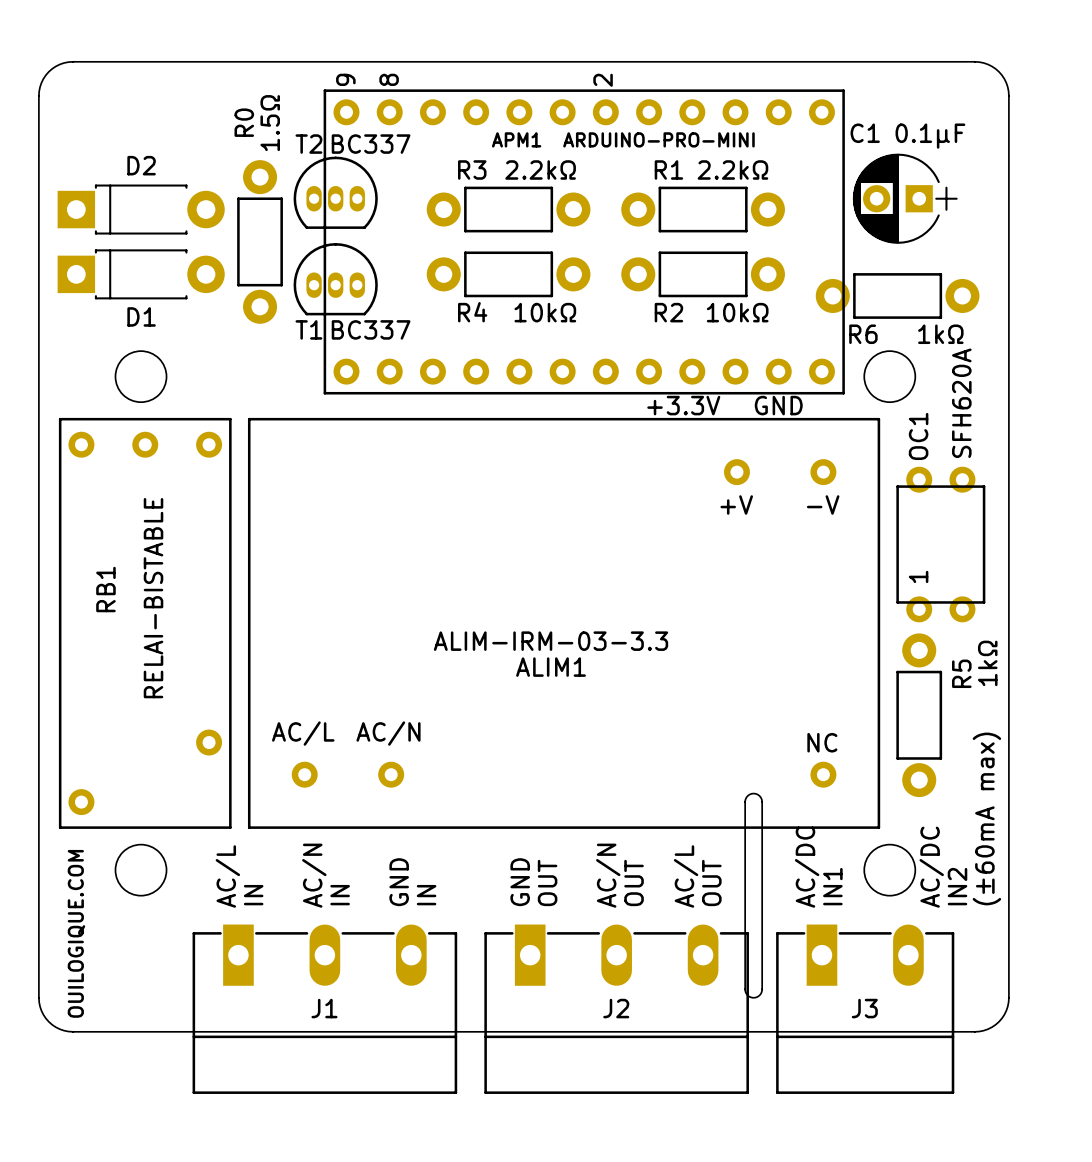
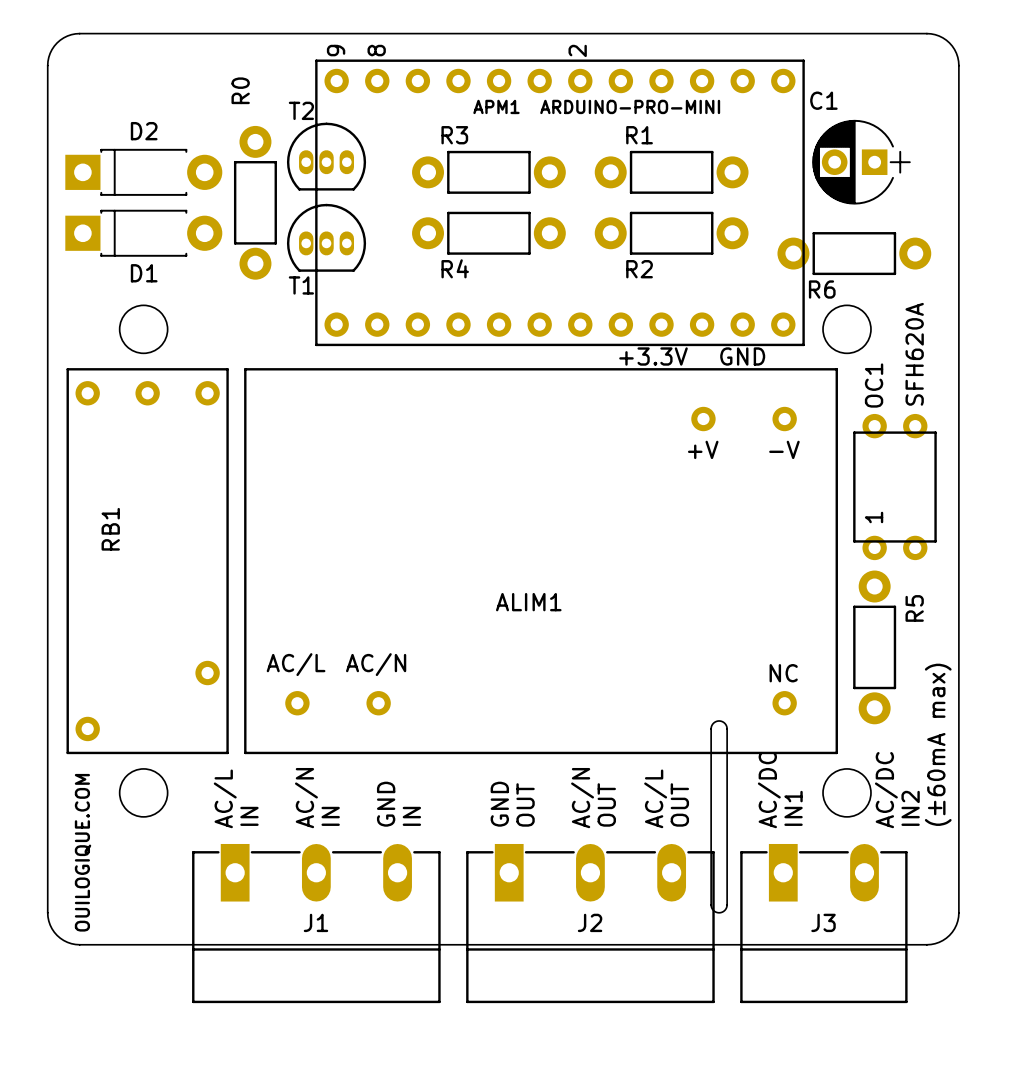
R0 value: 1.5Ω (270, 123) -> none
C1 value: 0.1µF (930, 136) -> none
T2 value: BC337 (371, 144) -> none
R3 value: 2.2kΩ (540, 169) -> none
R1 value: 2.2kΩ (732, 169) -> none
R4 value: 10kΩ (545, 312) -> none
R2 value: 10kΩ (737, 312) -> none
T1 value: BC337 (371, 329) -> none
R6 value: 1kΩ (940, 334) -> none
RB1 value: RELAI-BISTABLE (153, 598) -> none
ALIM1 value: ALIM-IRM-03-3.3 (551, 641) -> none
R5 value: 1kΩ (987, 663) -> none

